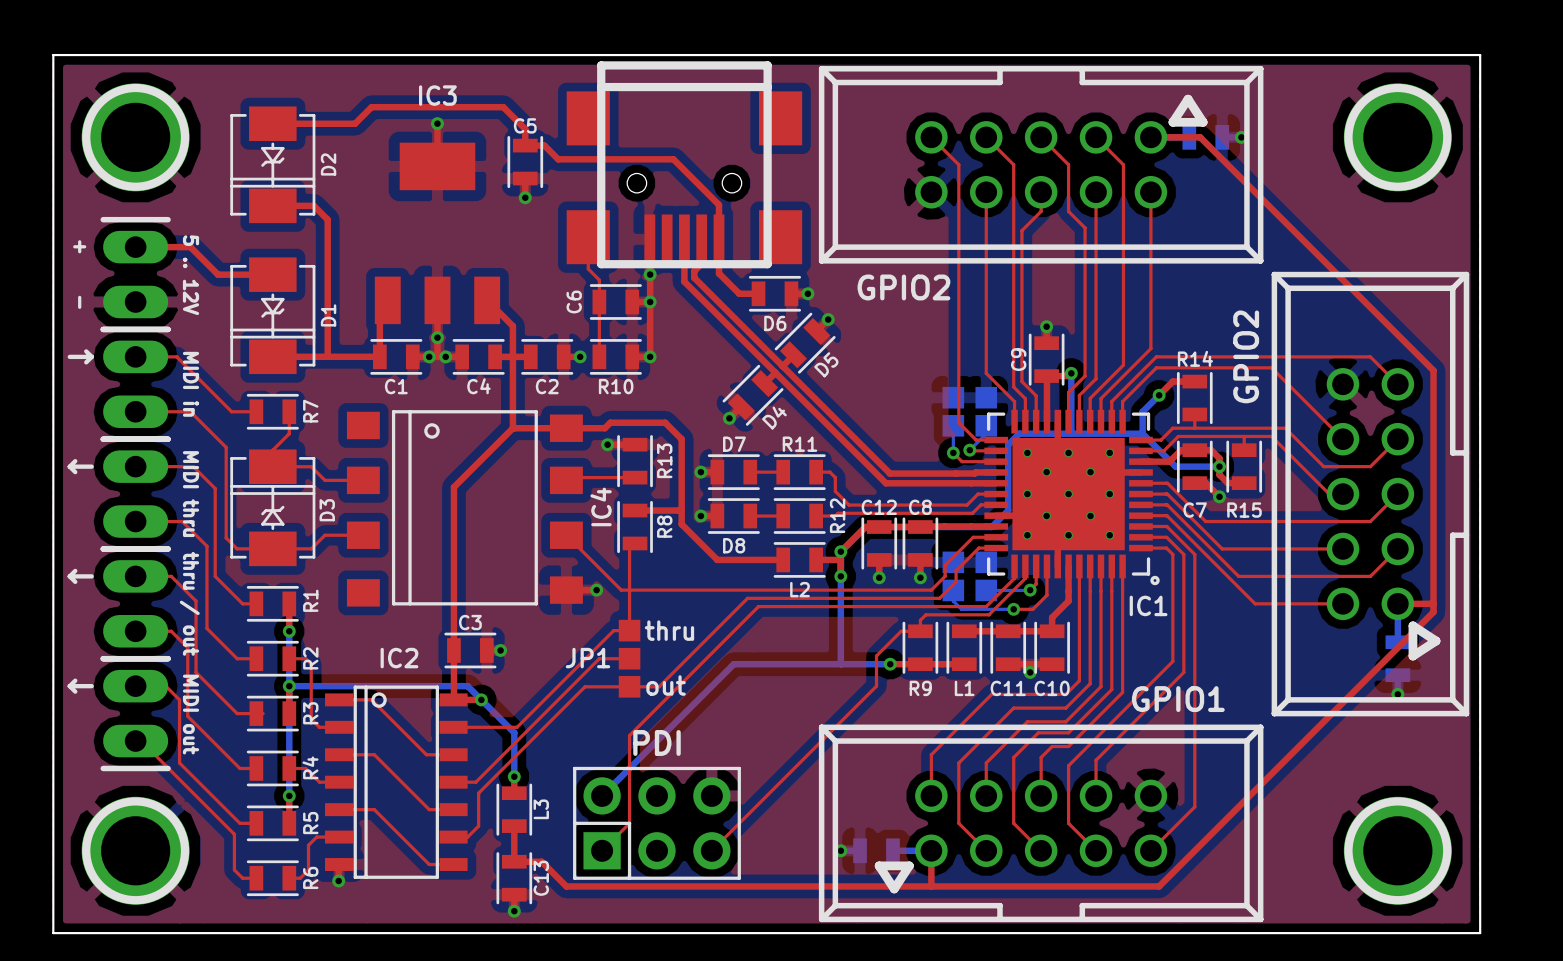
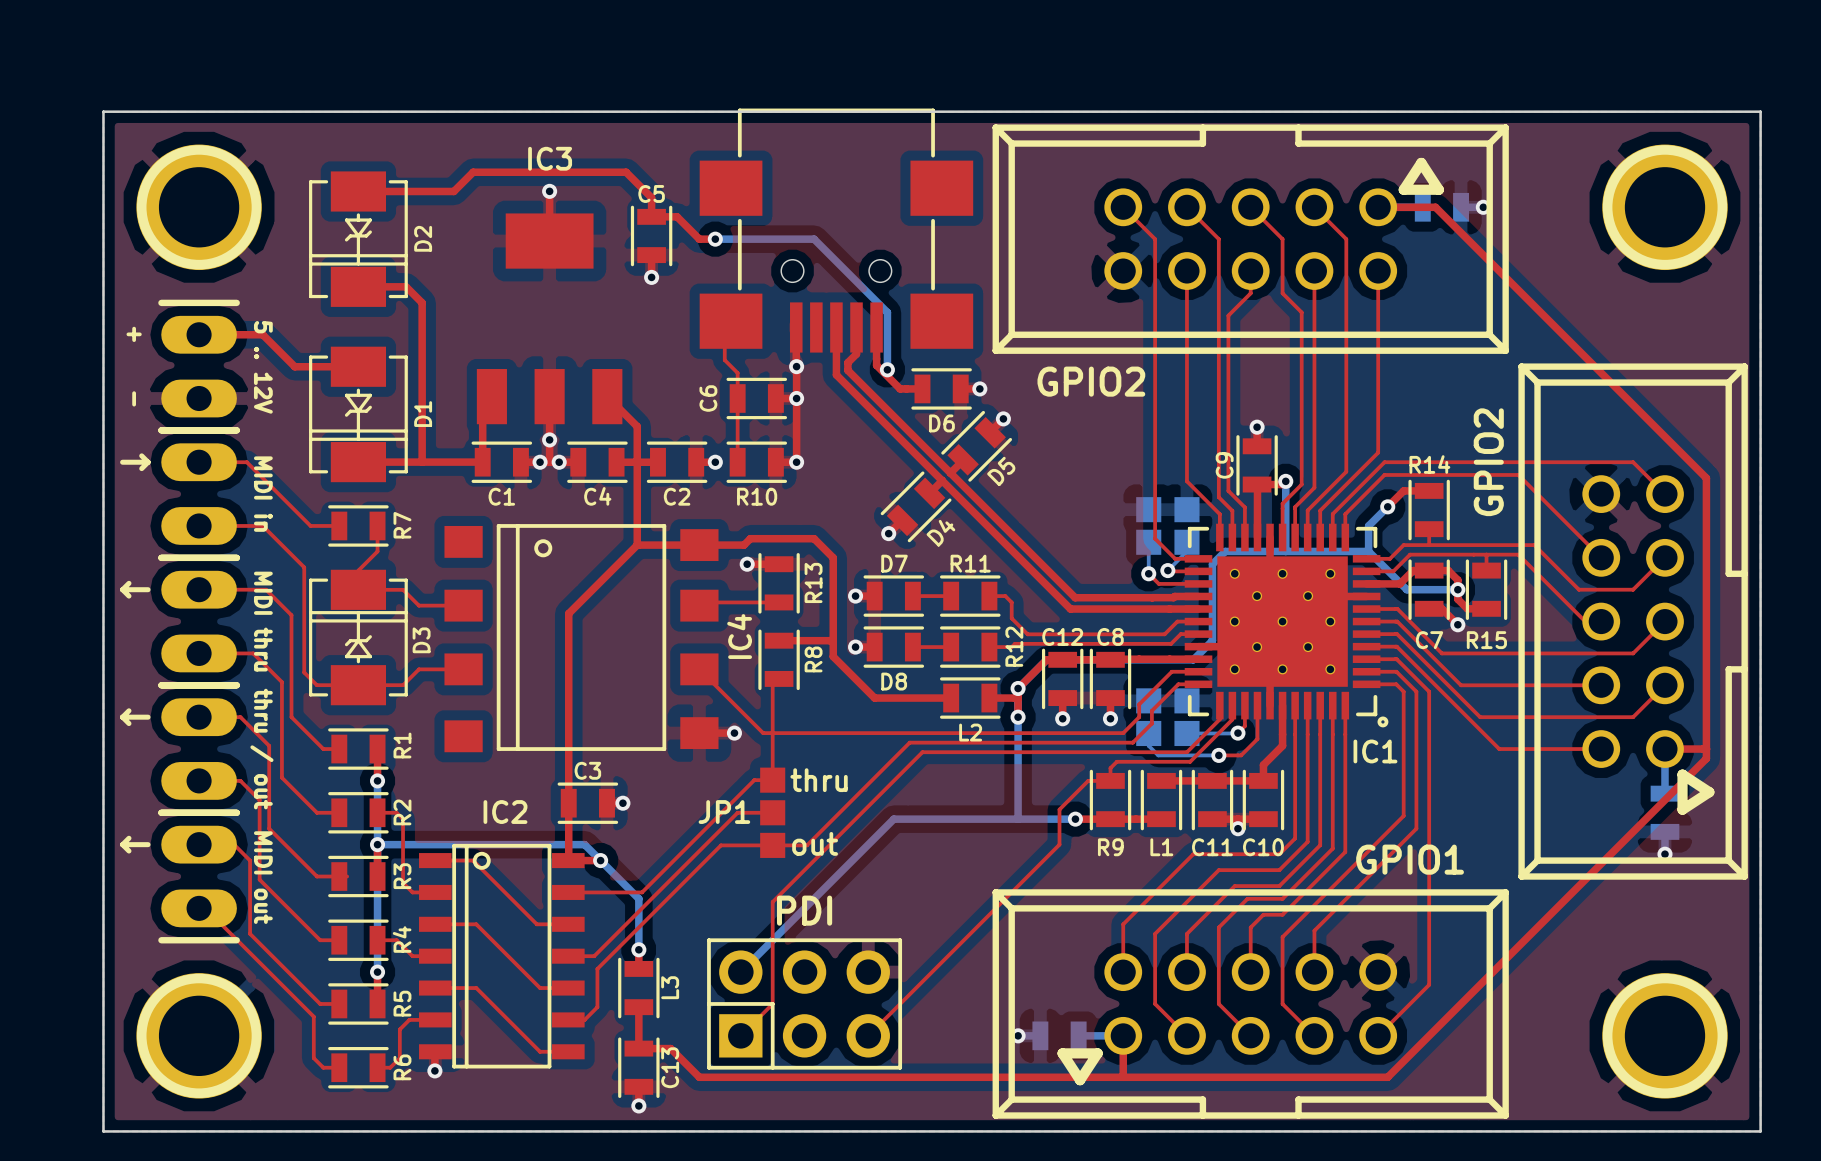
part footprint: [566, 61, 803, 269] -> [699, 108, 974, 353]
top track: (544, 145) (558, 159) (673, 159) (719, 204) (719, 239) -> (673, 216) (677, 216) (699, 239) (715, 239)
bottom track: none -> (715, 239) (814, 239) (887, 312) (887, 369)
via: none -> (715, 239)
via: none -> (887, 369)

